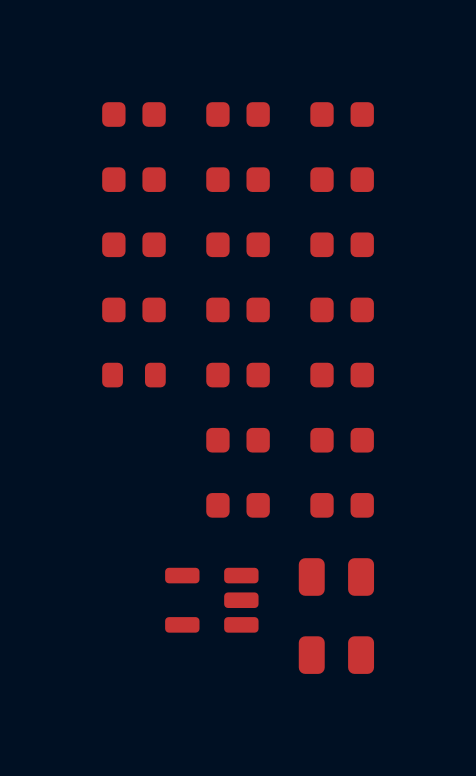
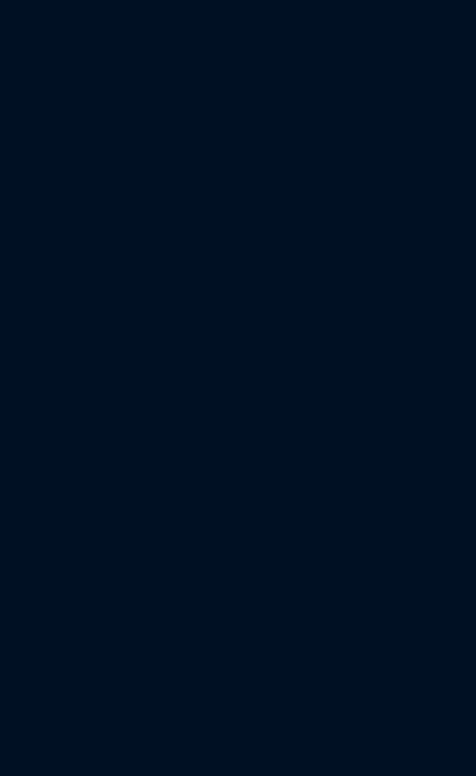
part: (133, 114) -> none
part: (238, 114) -> none
part: (342, 114) -> none
part: (133, 179) -> none
part: (238, 179) -> none
part: (342, 179) -> none
part: (133, 244) -> none
part: (238, 244) -> none
part: (342, 244) -> none
part: (133, 309) -> none
part: (238, 309) -> none
part: (342, 309) -> none
part: (133, 375) -> none
part: (238, 375) -> none
part: (342, 375) -> none
part: (238, 440) -> none
part: (342, 440) -> none
part: (238, 505) -> none
part: (342, 505) -> none
part: (336, 576) -> none
part: (211, 600) -> none
part: (336, 655) -> none

